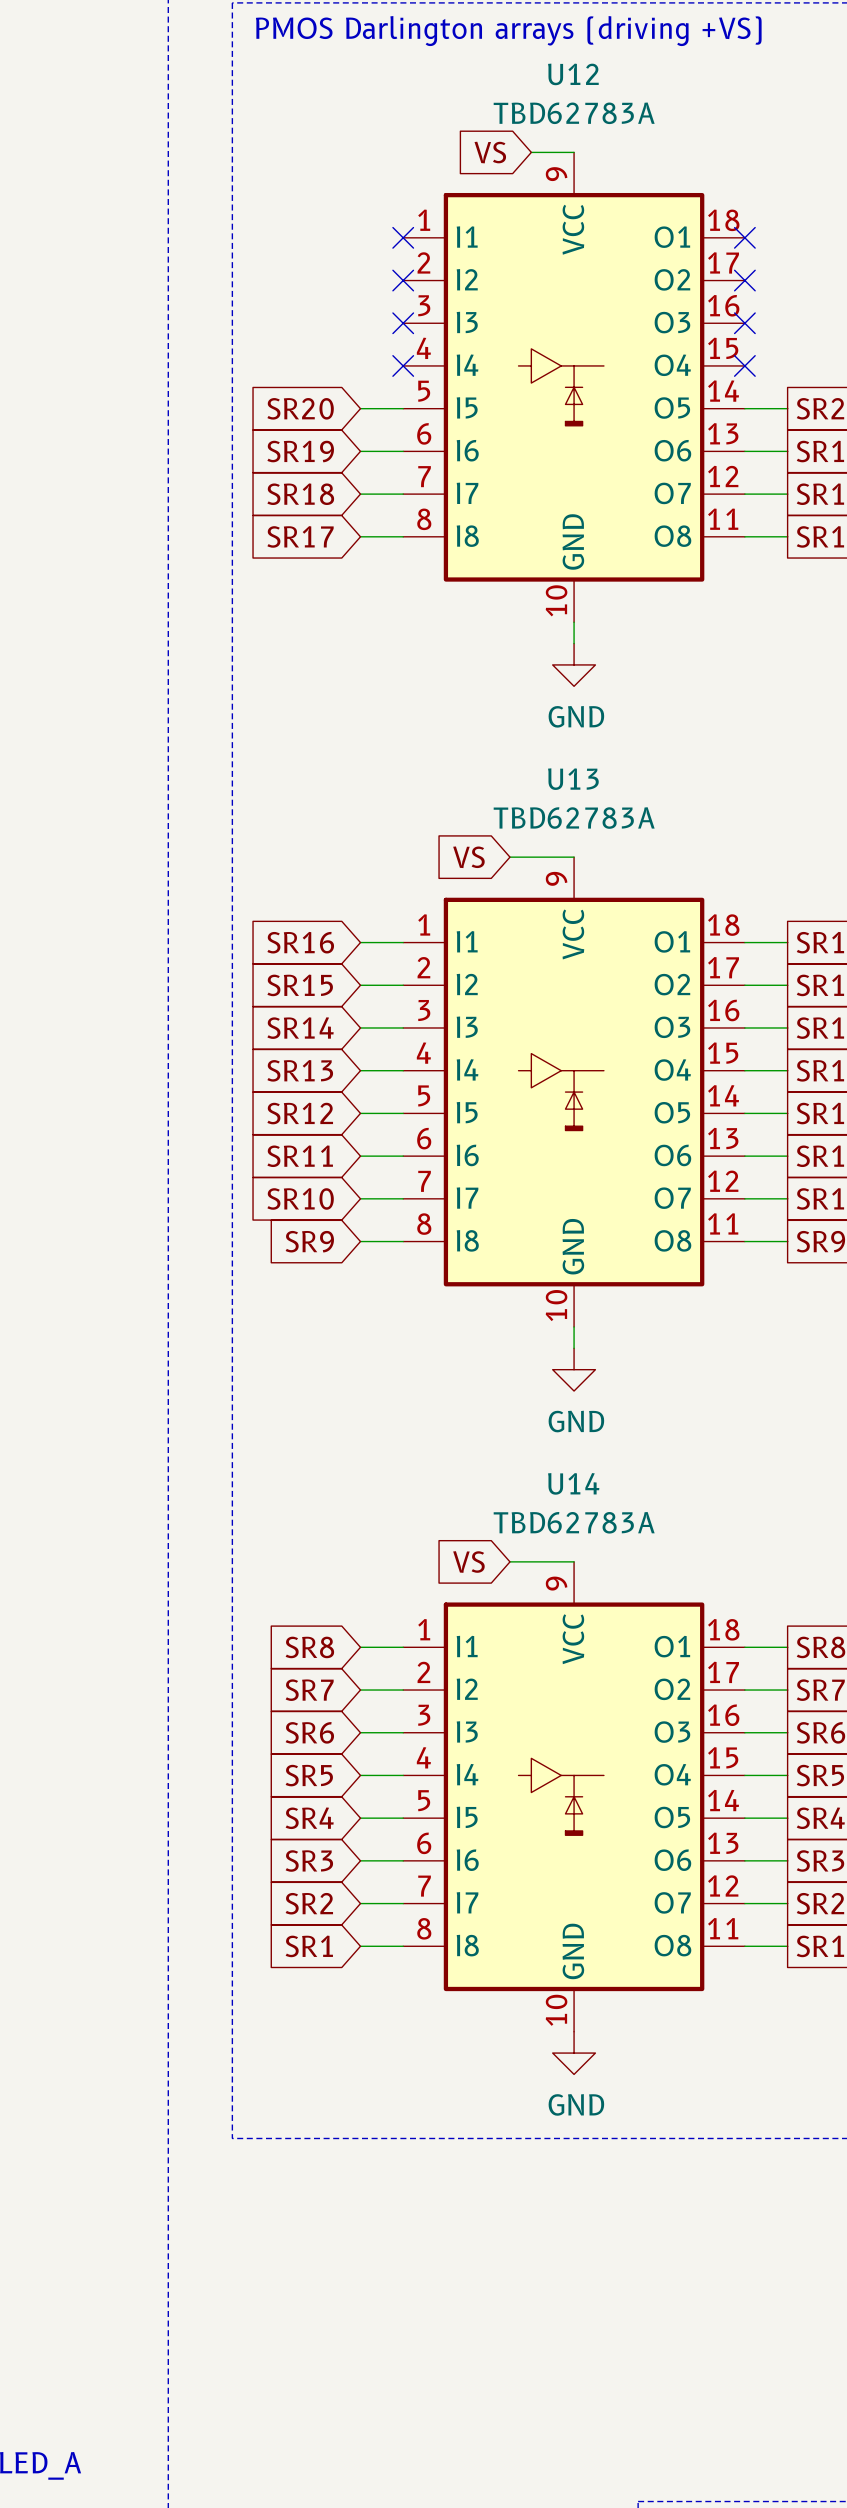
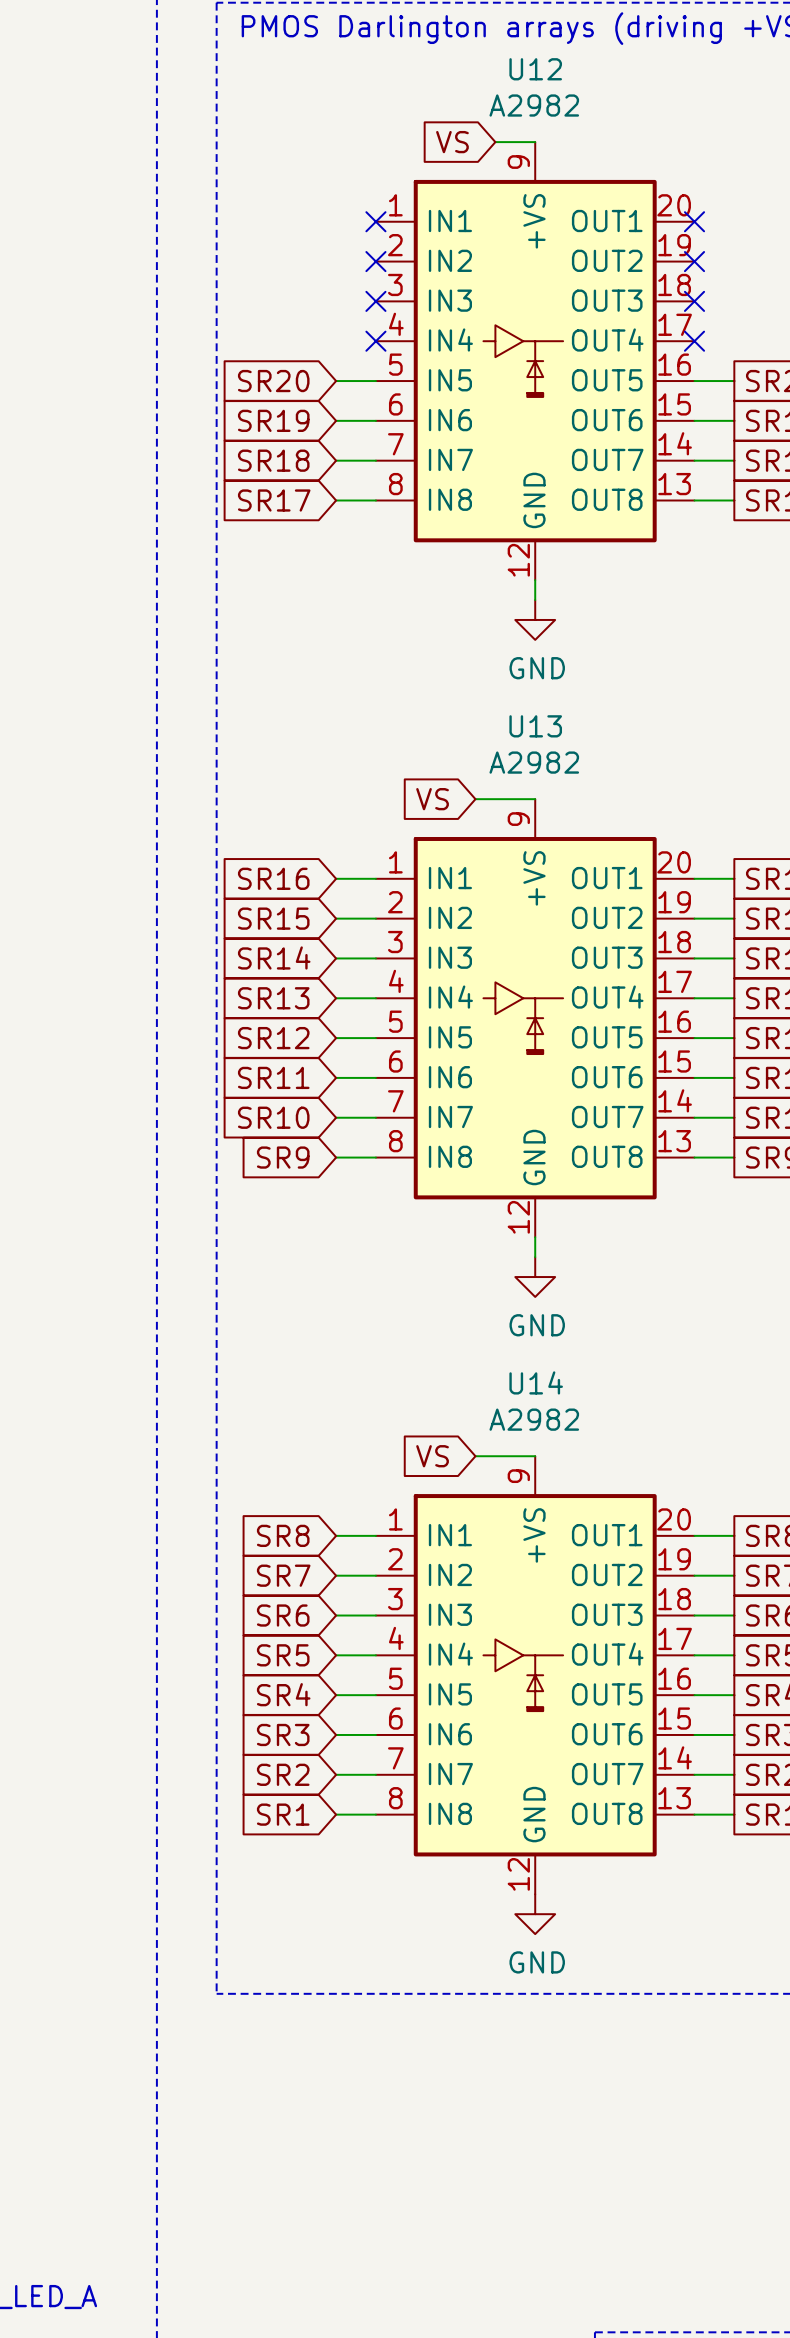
U12 value: TBD62783A (574, 113) -> A2982 (534, 105)
U12 symbol: [403, 152, 745, 623] -> [375, 142, 695, 581]
U13 value: TBD62783A (574, 818) -> A2982 (534, 762)
U13 symbol: [403, 857, 745, 1327] -> [375, 799, 695, 1238]
U14 value: TBD62783A (574, 1522) -> A2982 (534, 1419)
U14 symbol: [403, 1561, 745, 2032] -> [375, 1456, 695, 1895]

